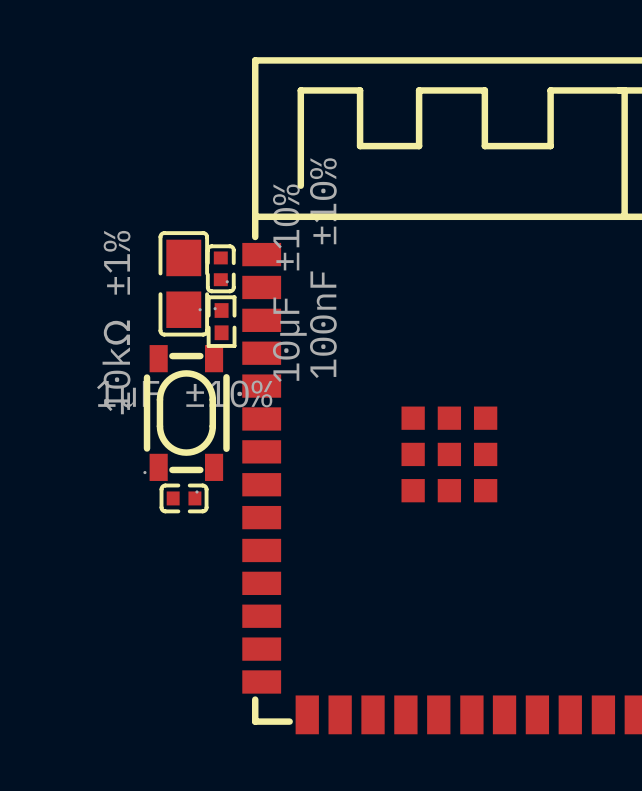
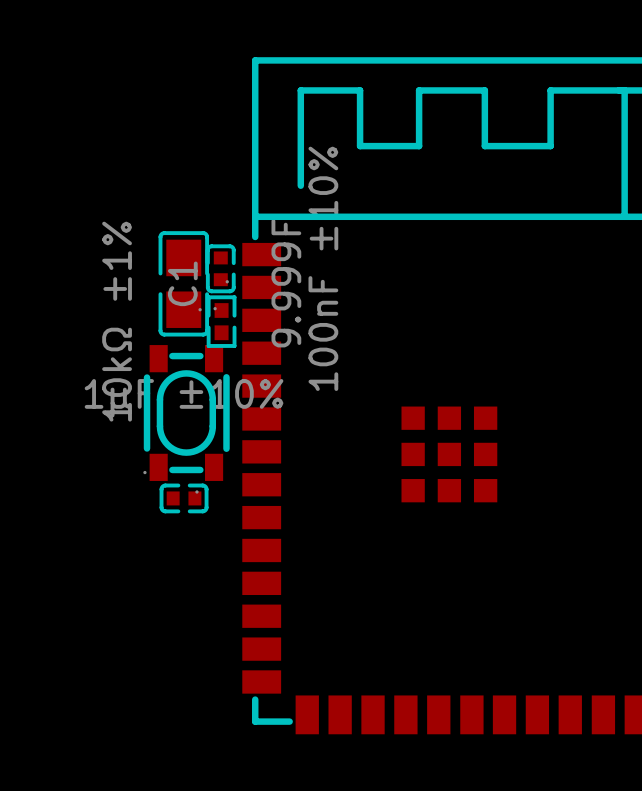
C1 name: none -> C1 (182, 283)
C1 value: 10µF ±10% (289, 283) -> 9.999F (286, 283)

